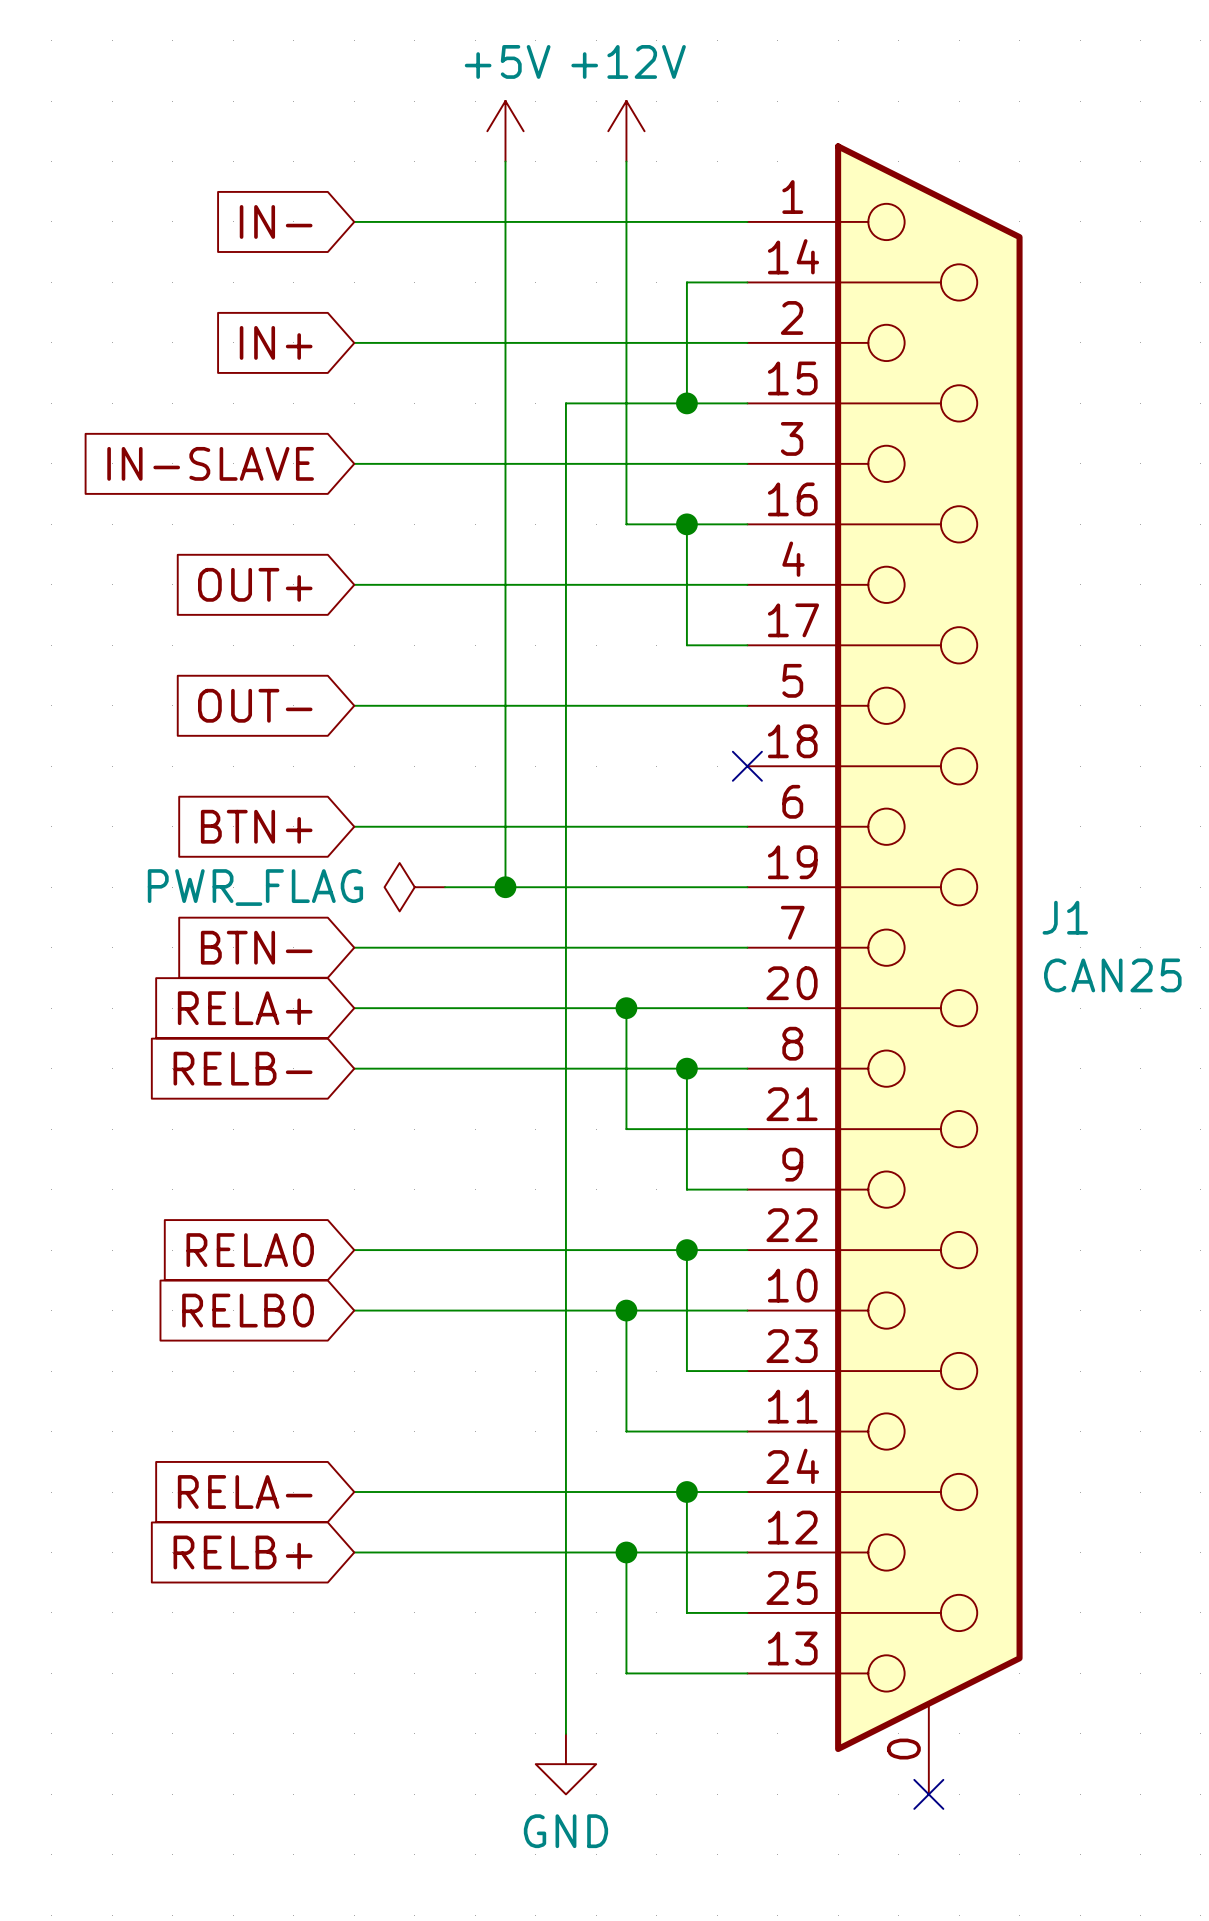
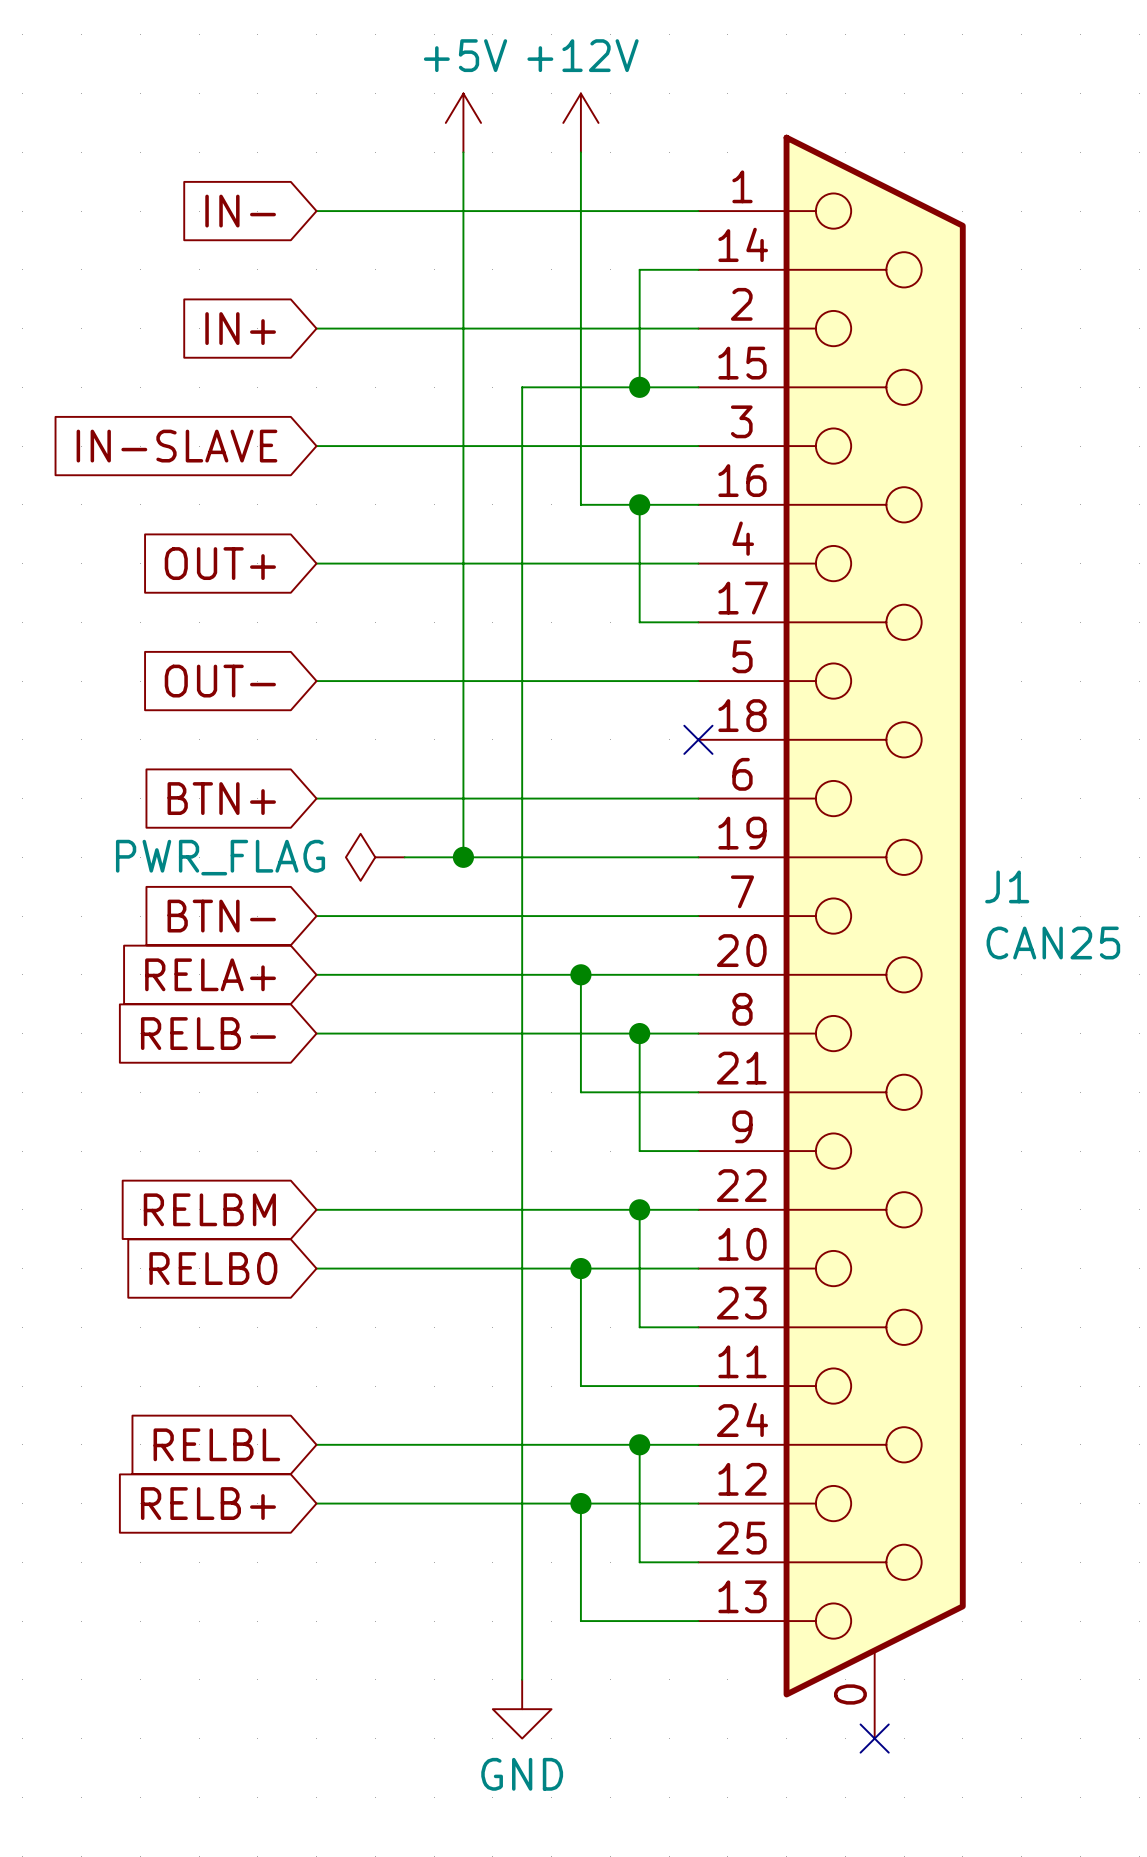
global label: RELA0 (250, 1250) -> RELBM (209, 1209)
global label: RELA- (245, 1492) -> RELBL (216, 1444)

